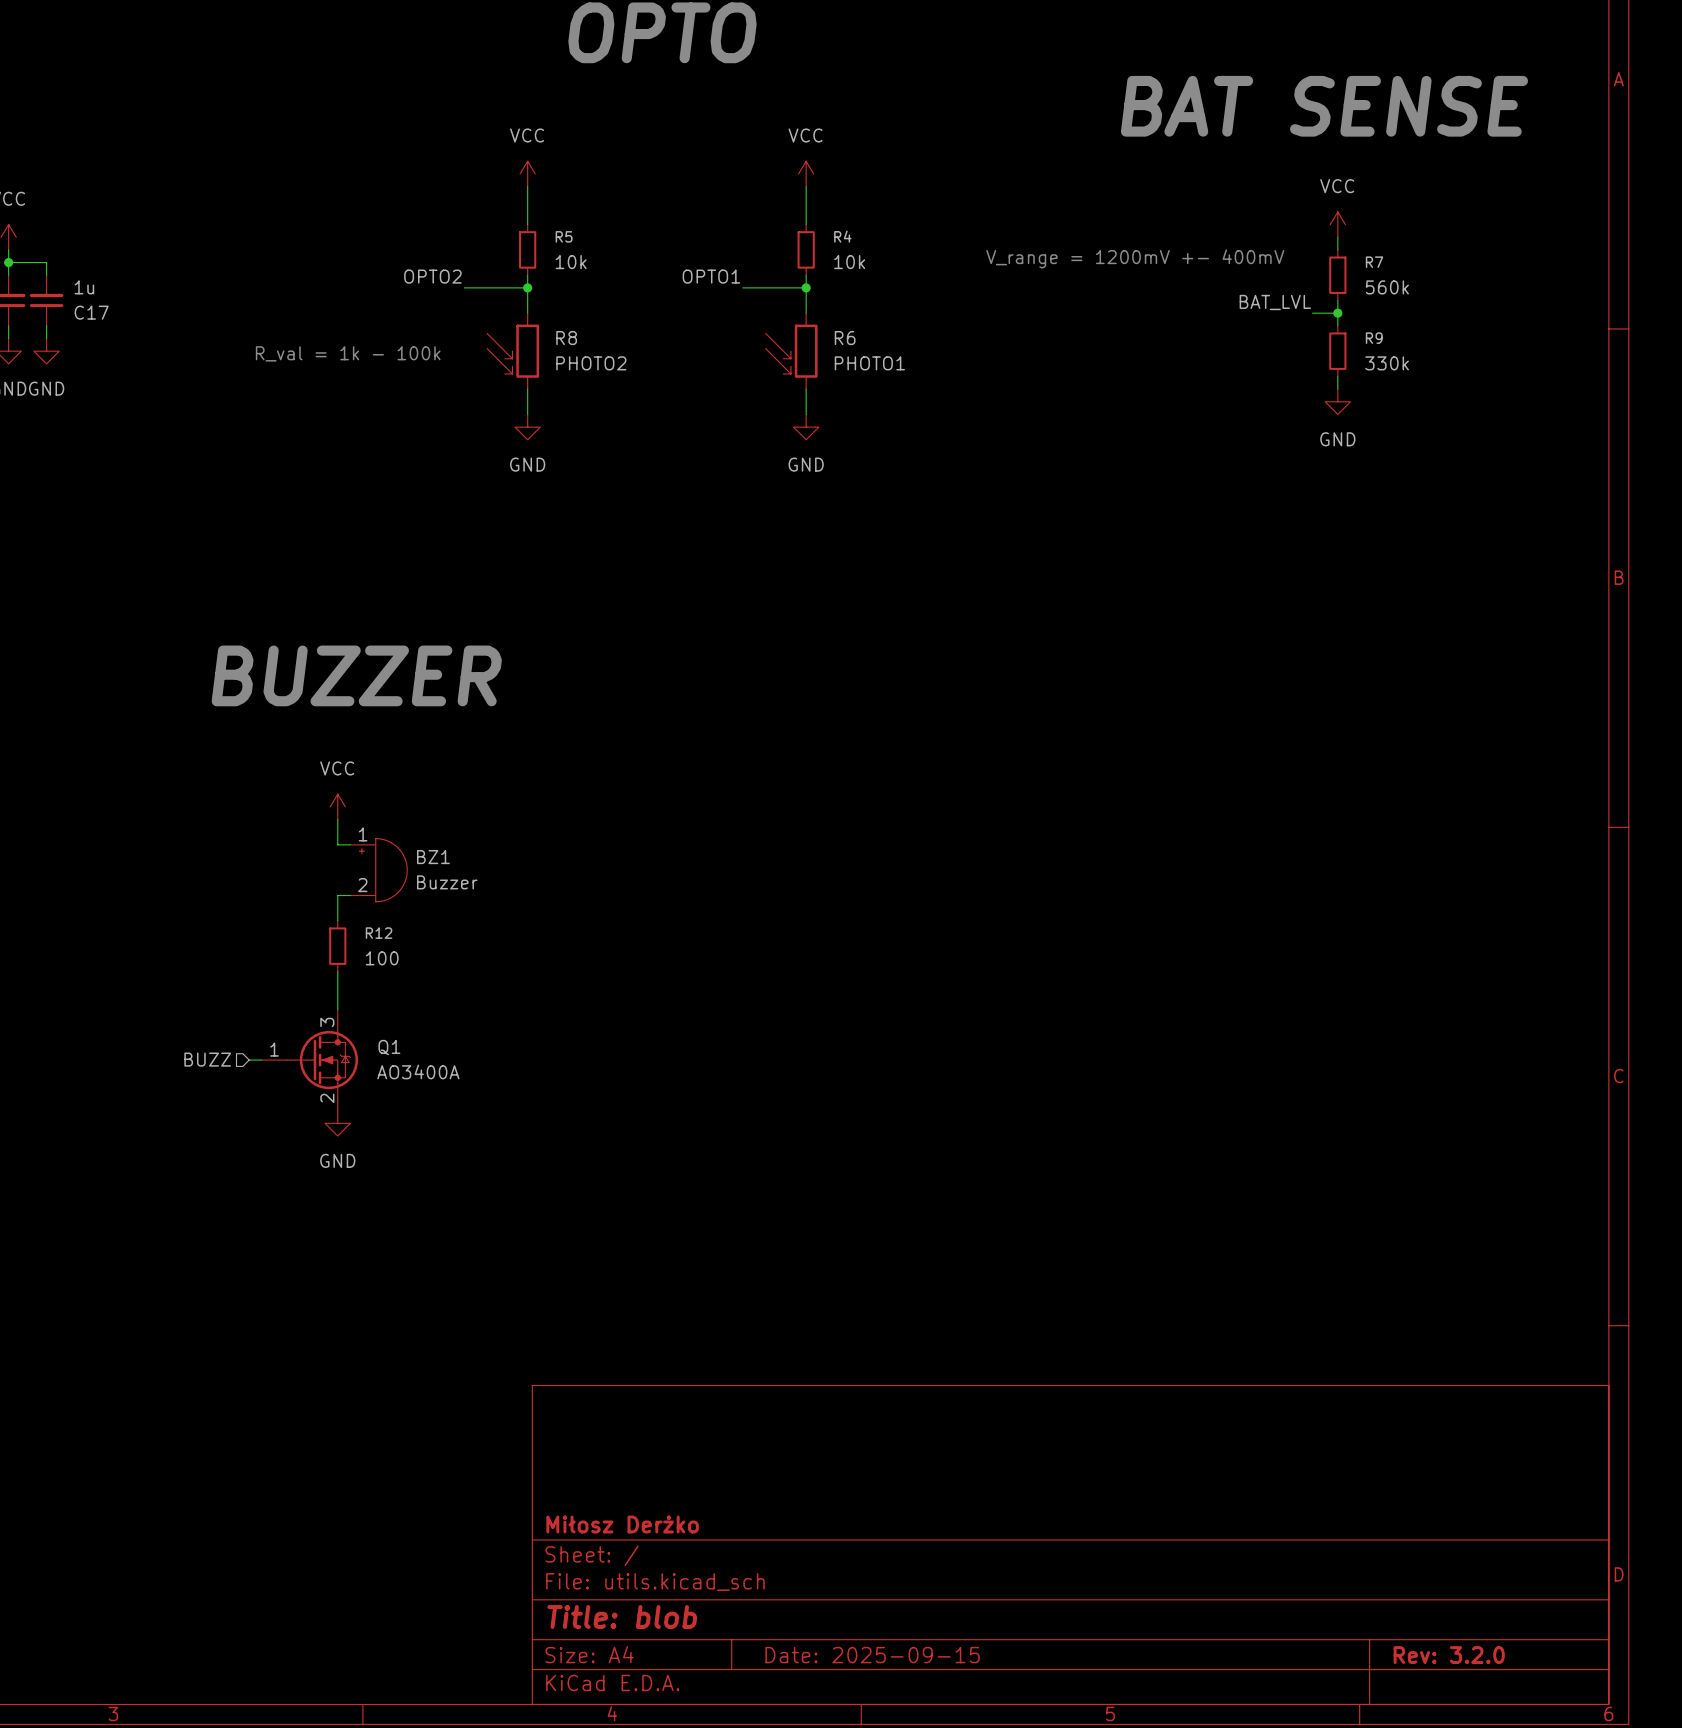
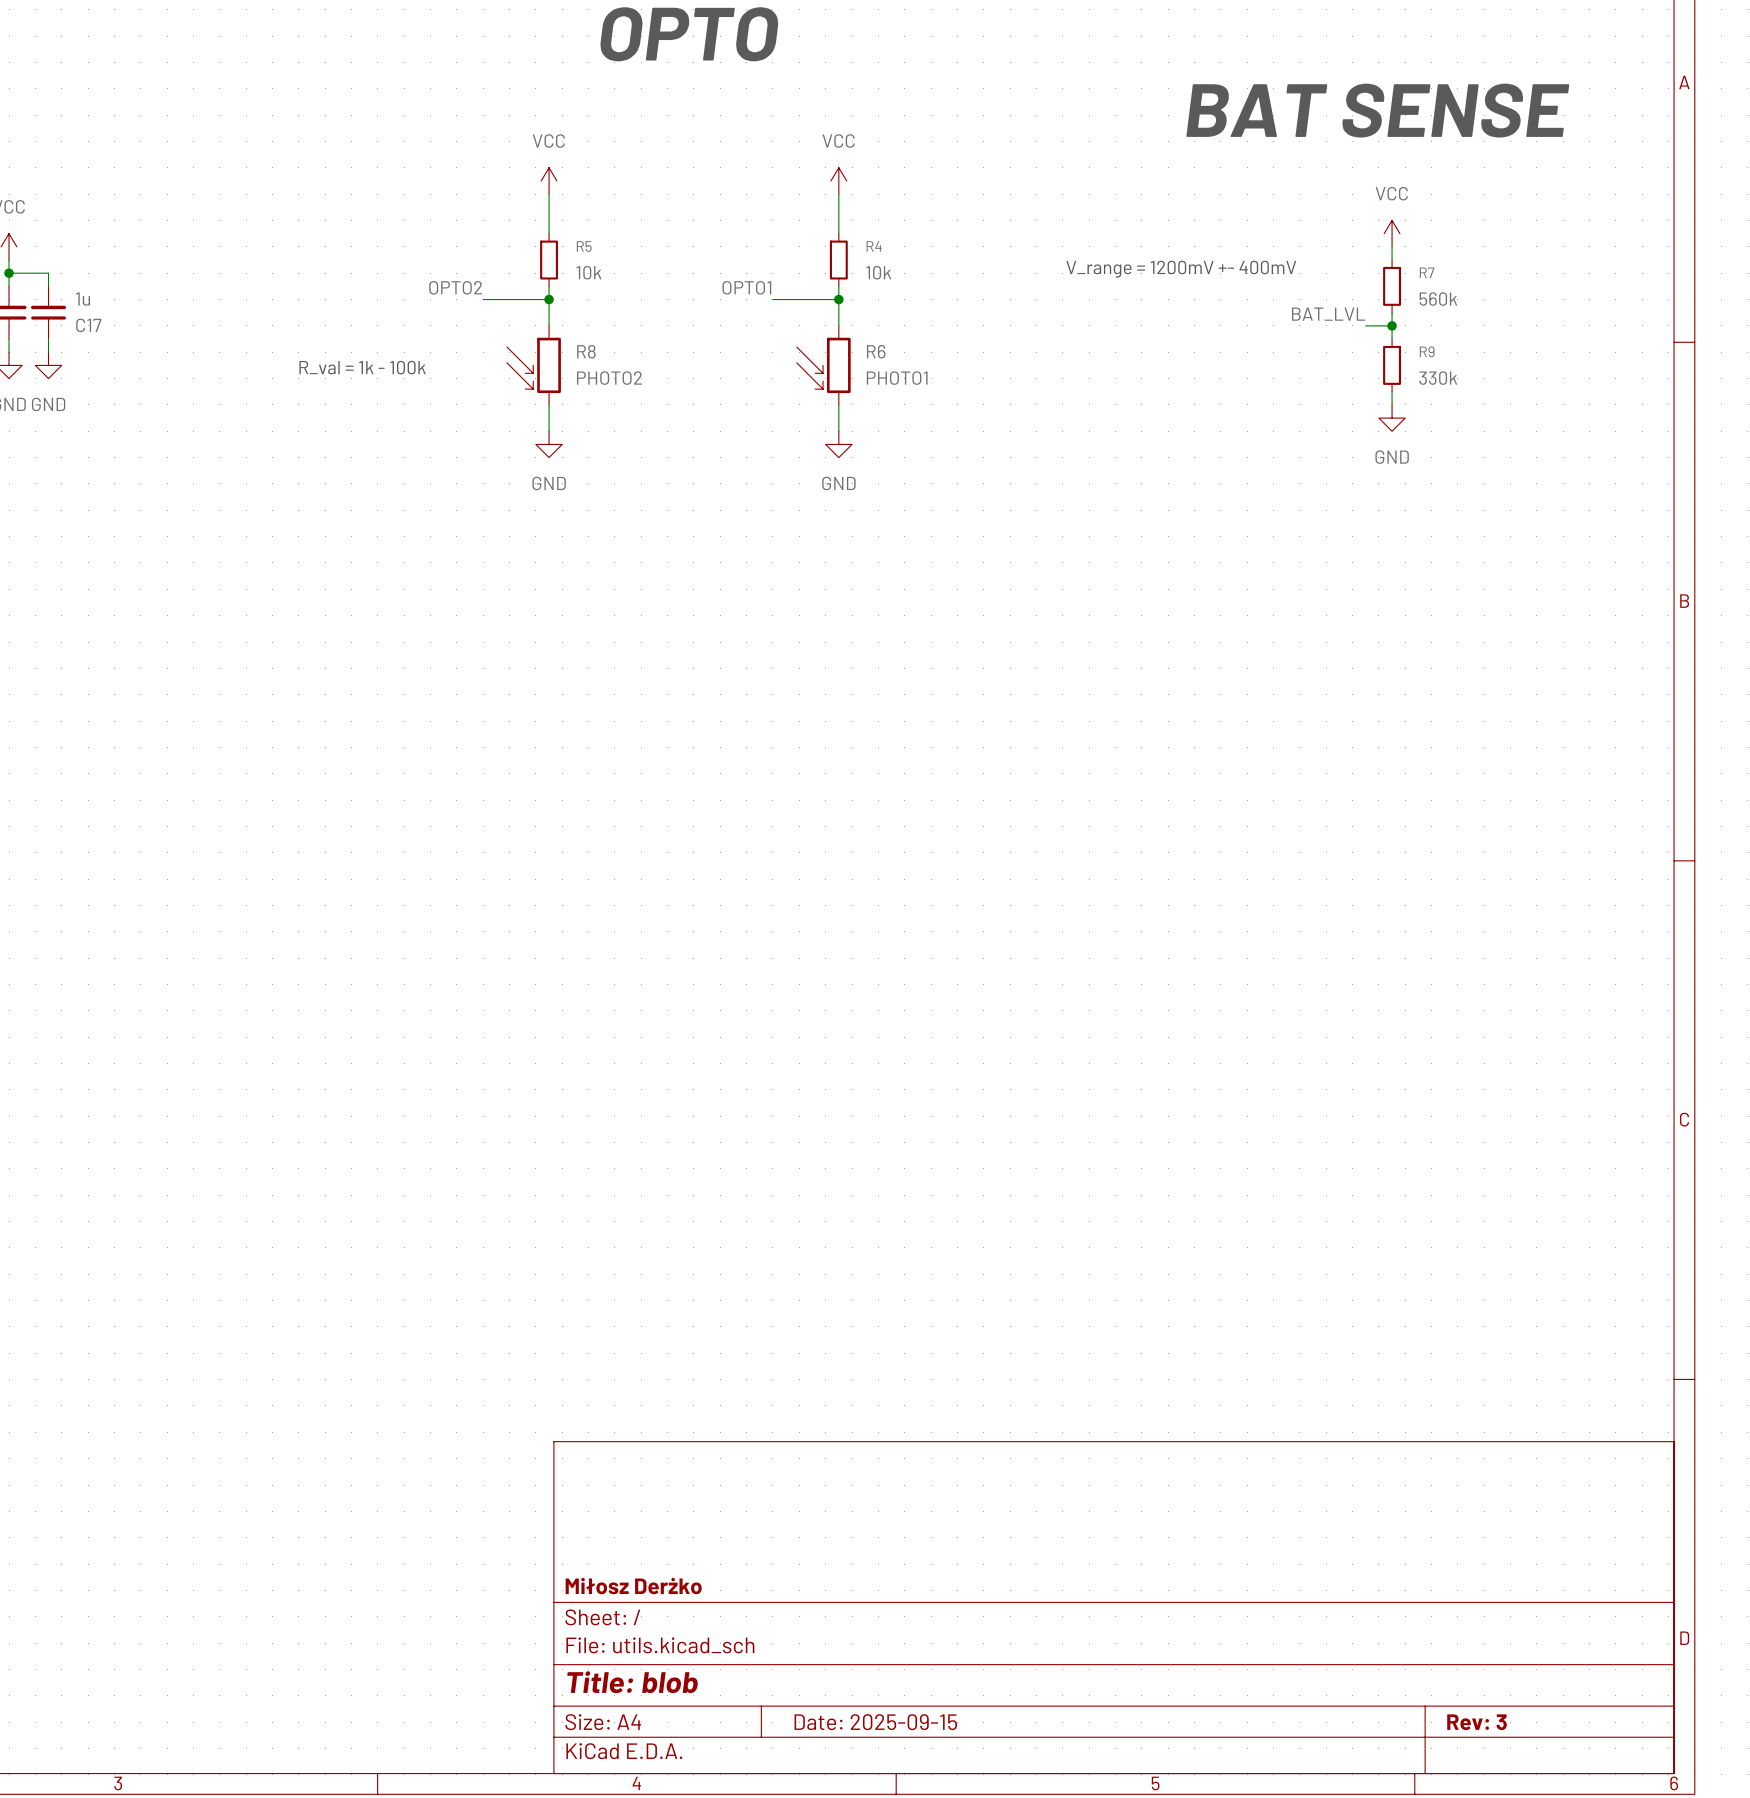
text: BUZZER (356, 675) -> none
power symbol: VCC (337, 806) -> none
wire: (337, 819) (337, 844) (350, 844) -> none
BZ1: Buzzer (378, 870) -> none
wire: (350, 895) (337, 895) (337, 920) -> none
R12: 100 (337, 946) -> none
wire: (337, 971) (337, 1009) -> none
hierarchical label: BUZZ (207, 1059) -> none
wire: (249, 1060) (261, 1060) -> none
Q1: AO3400A (309, 1060) -> none
power symbol: GND (337, 1123) -> none
title block: Rev: 3.2.0 (1449, 1655) -> Rev: 3 (1477, 1722)

